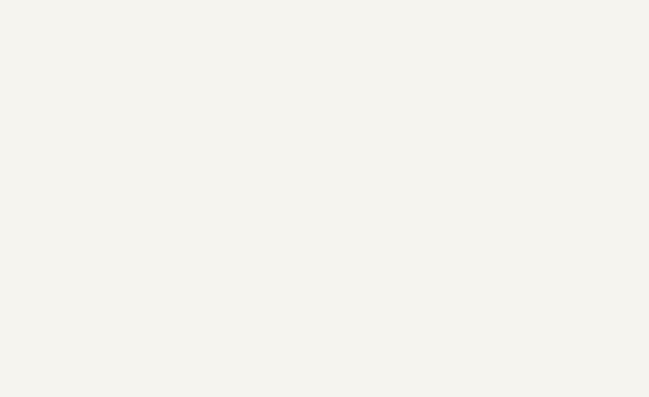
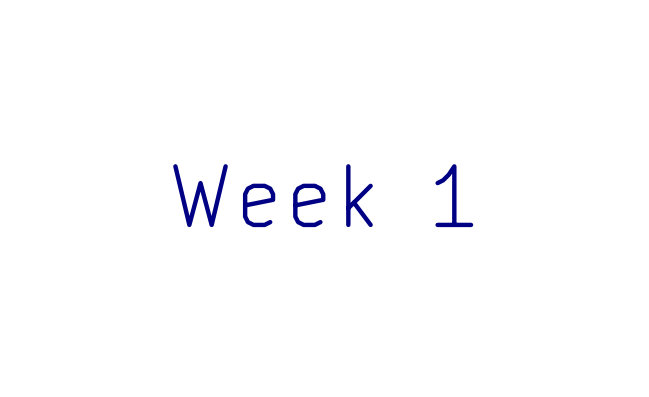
text: none -> Week 1 (323, 195)

